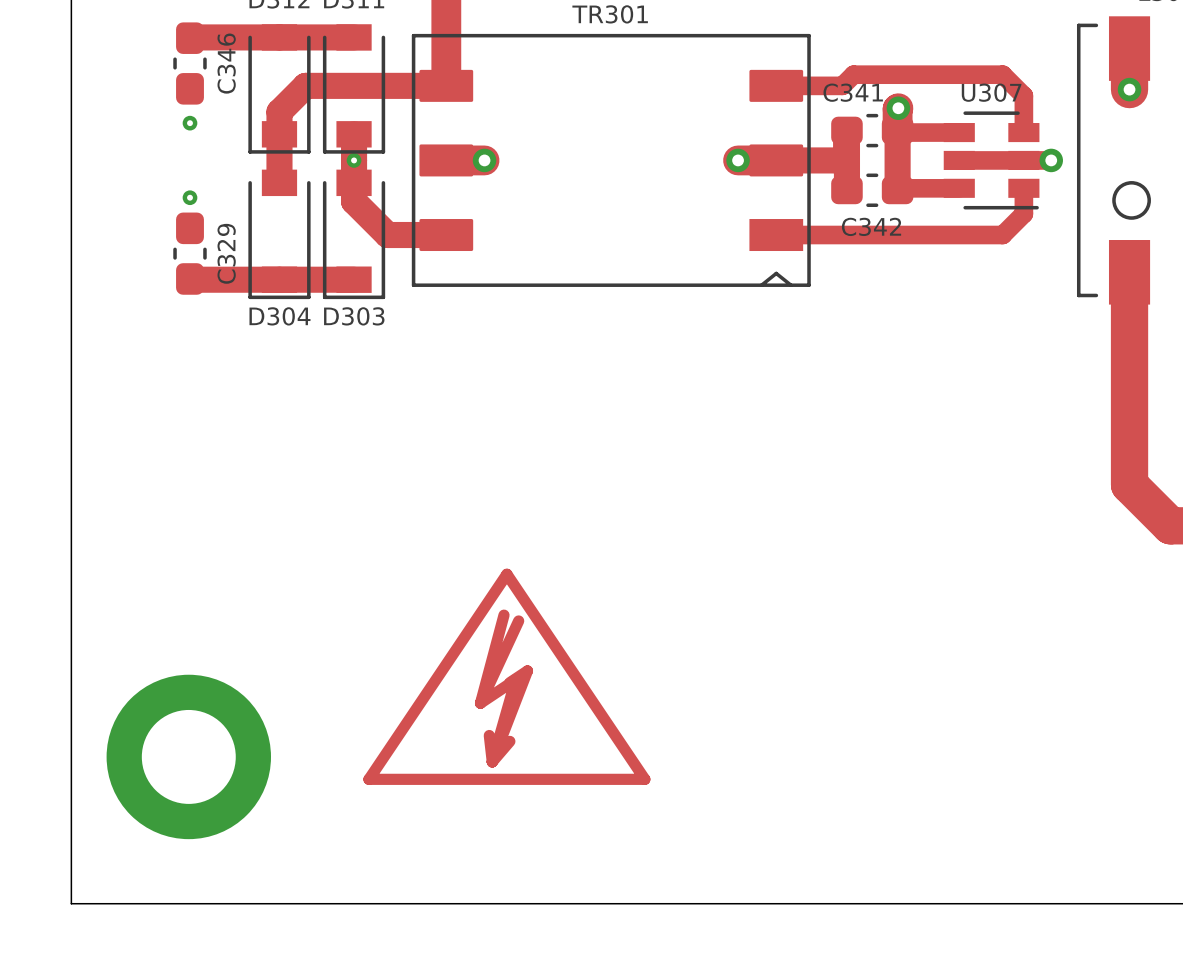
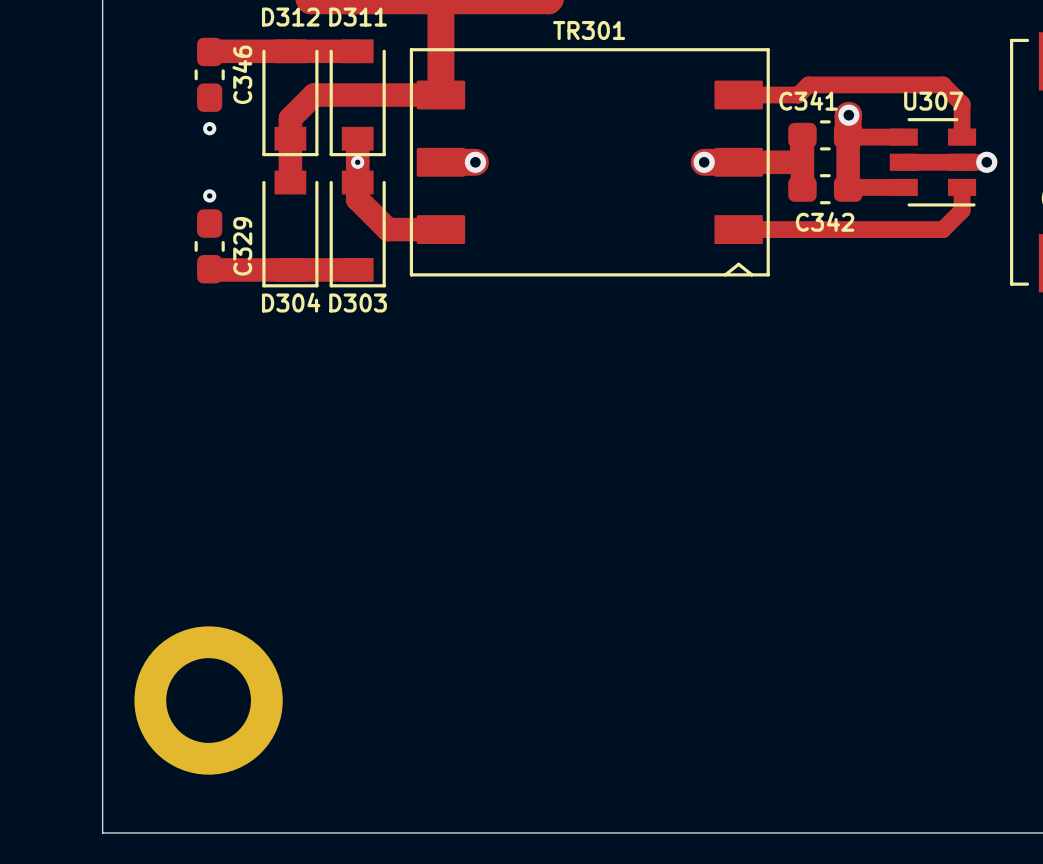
drawing: [363, 568, 651, 785] -> none

